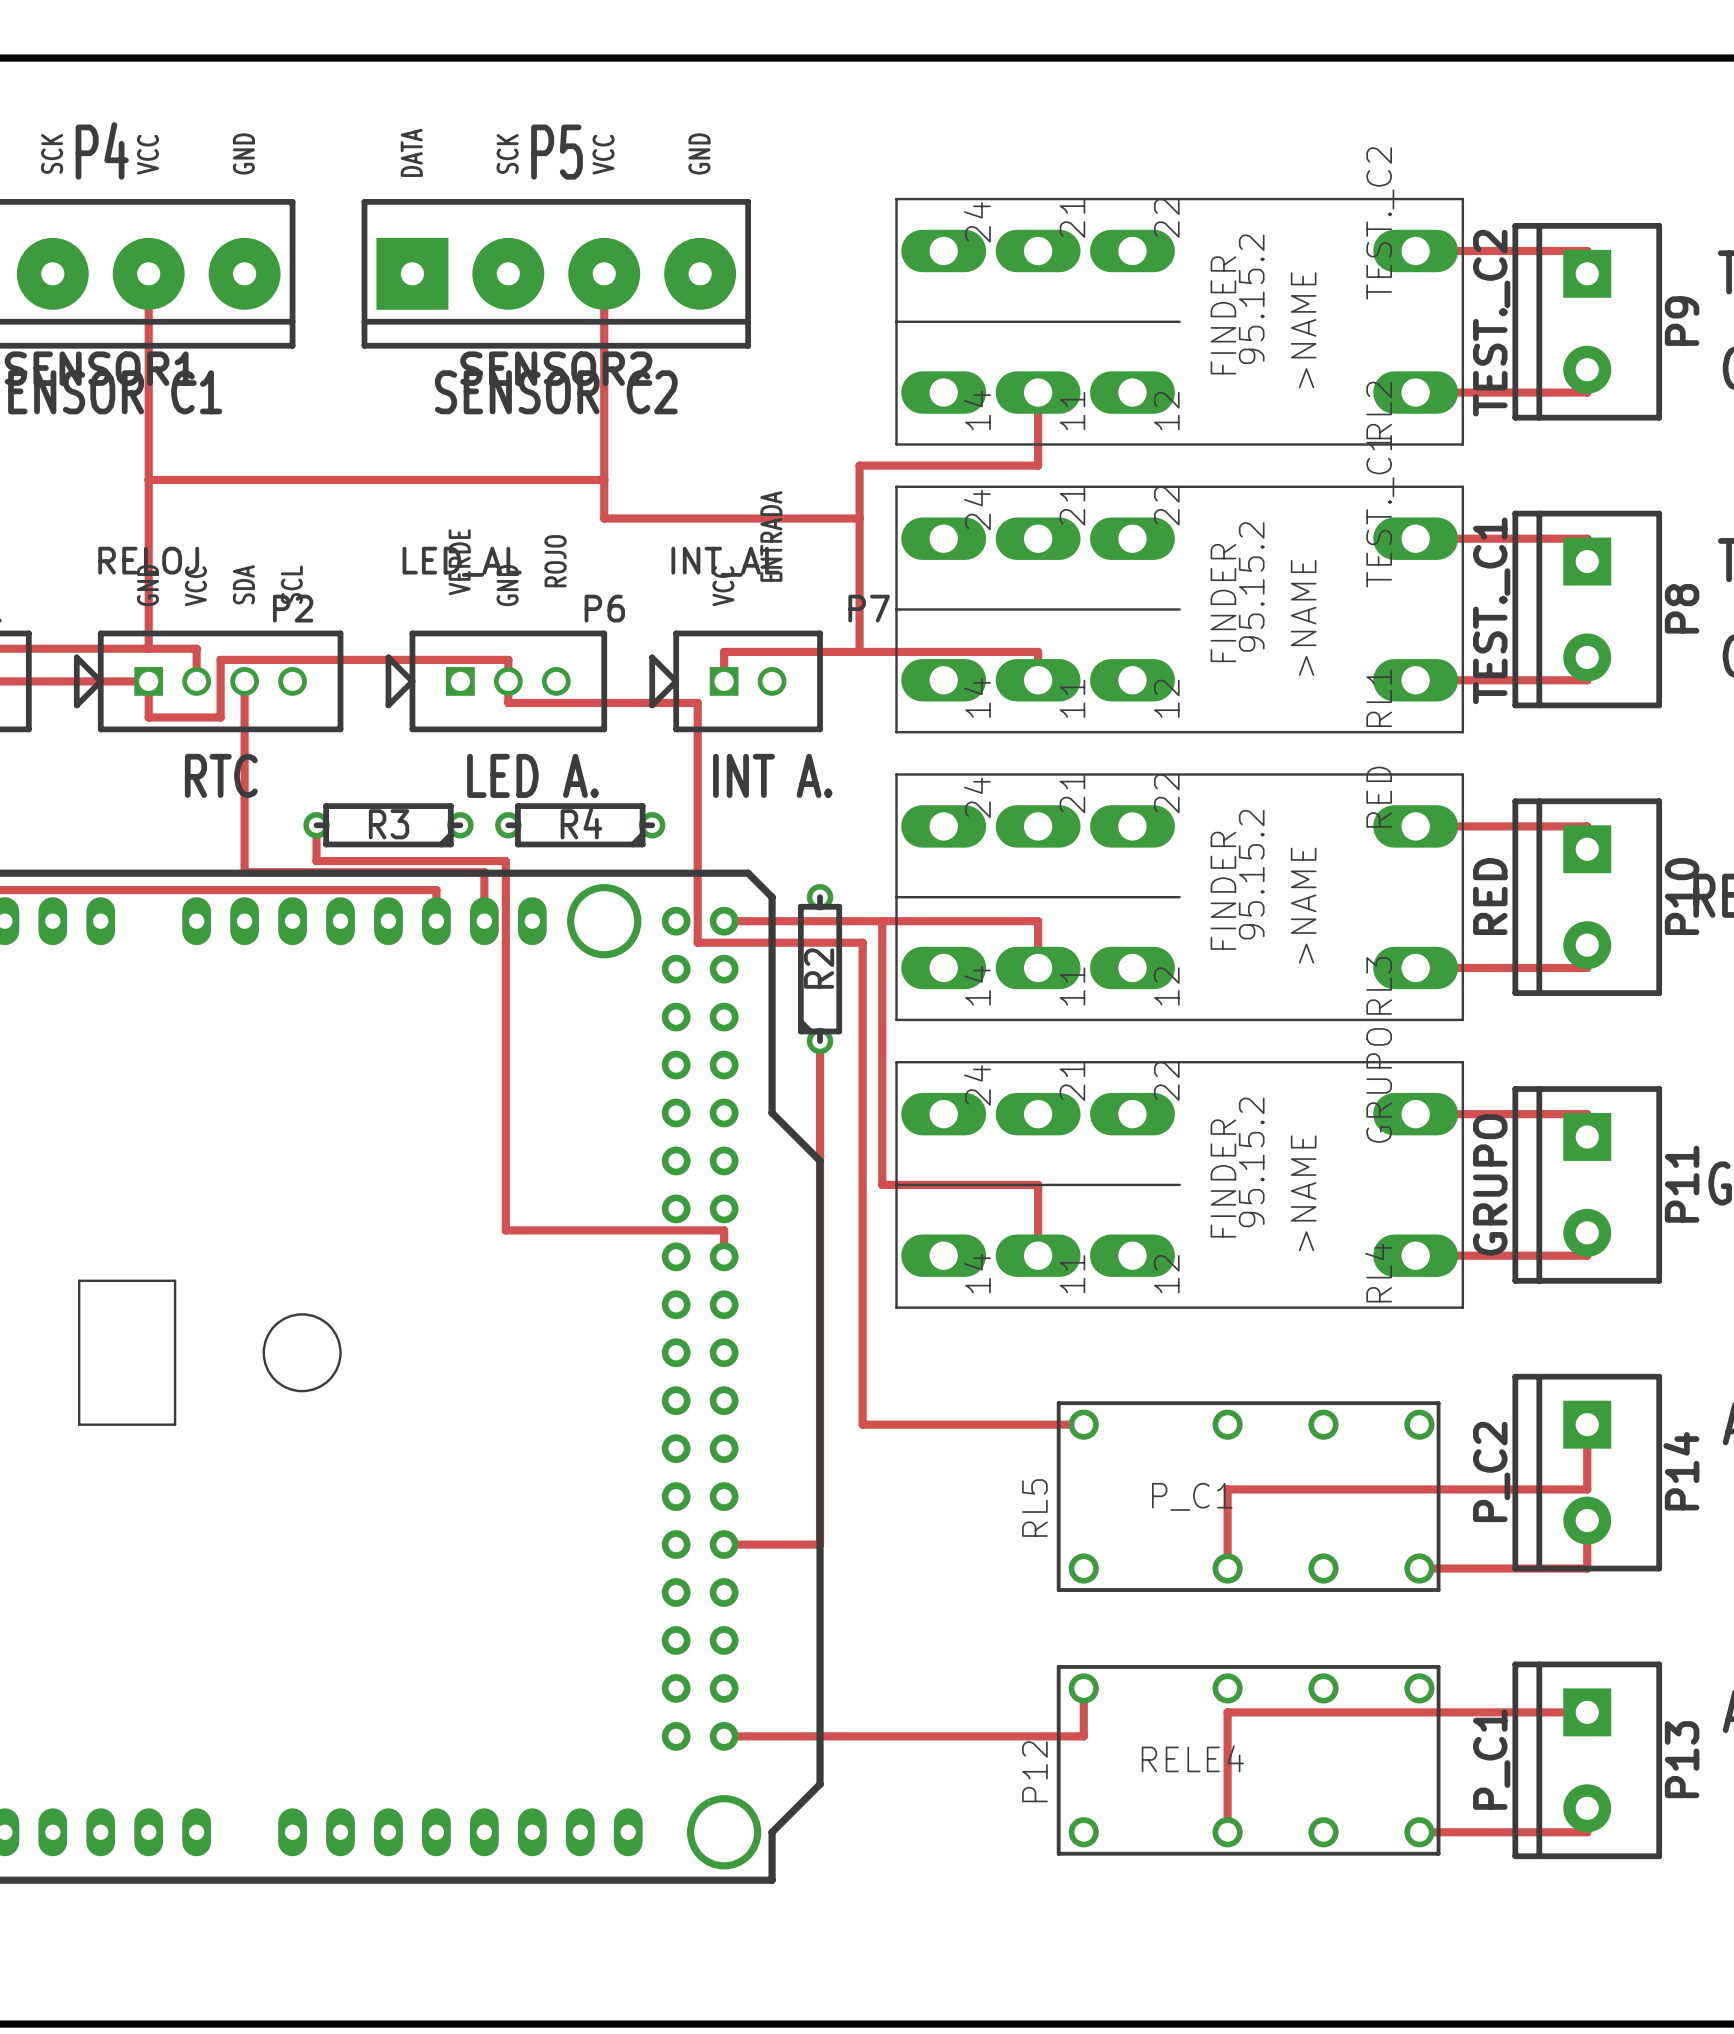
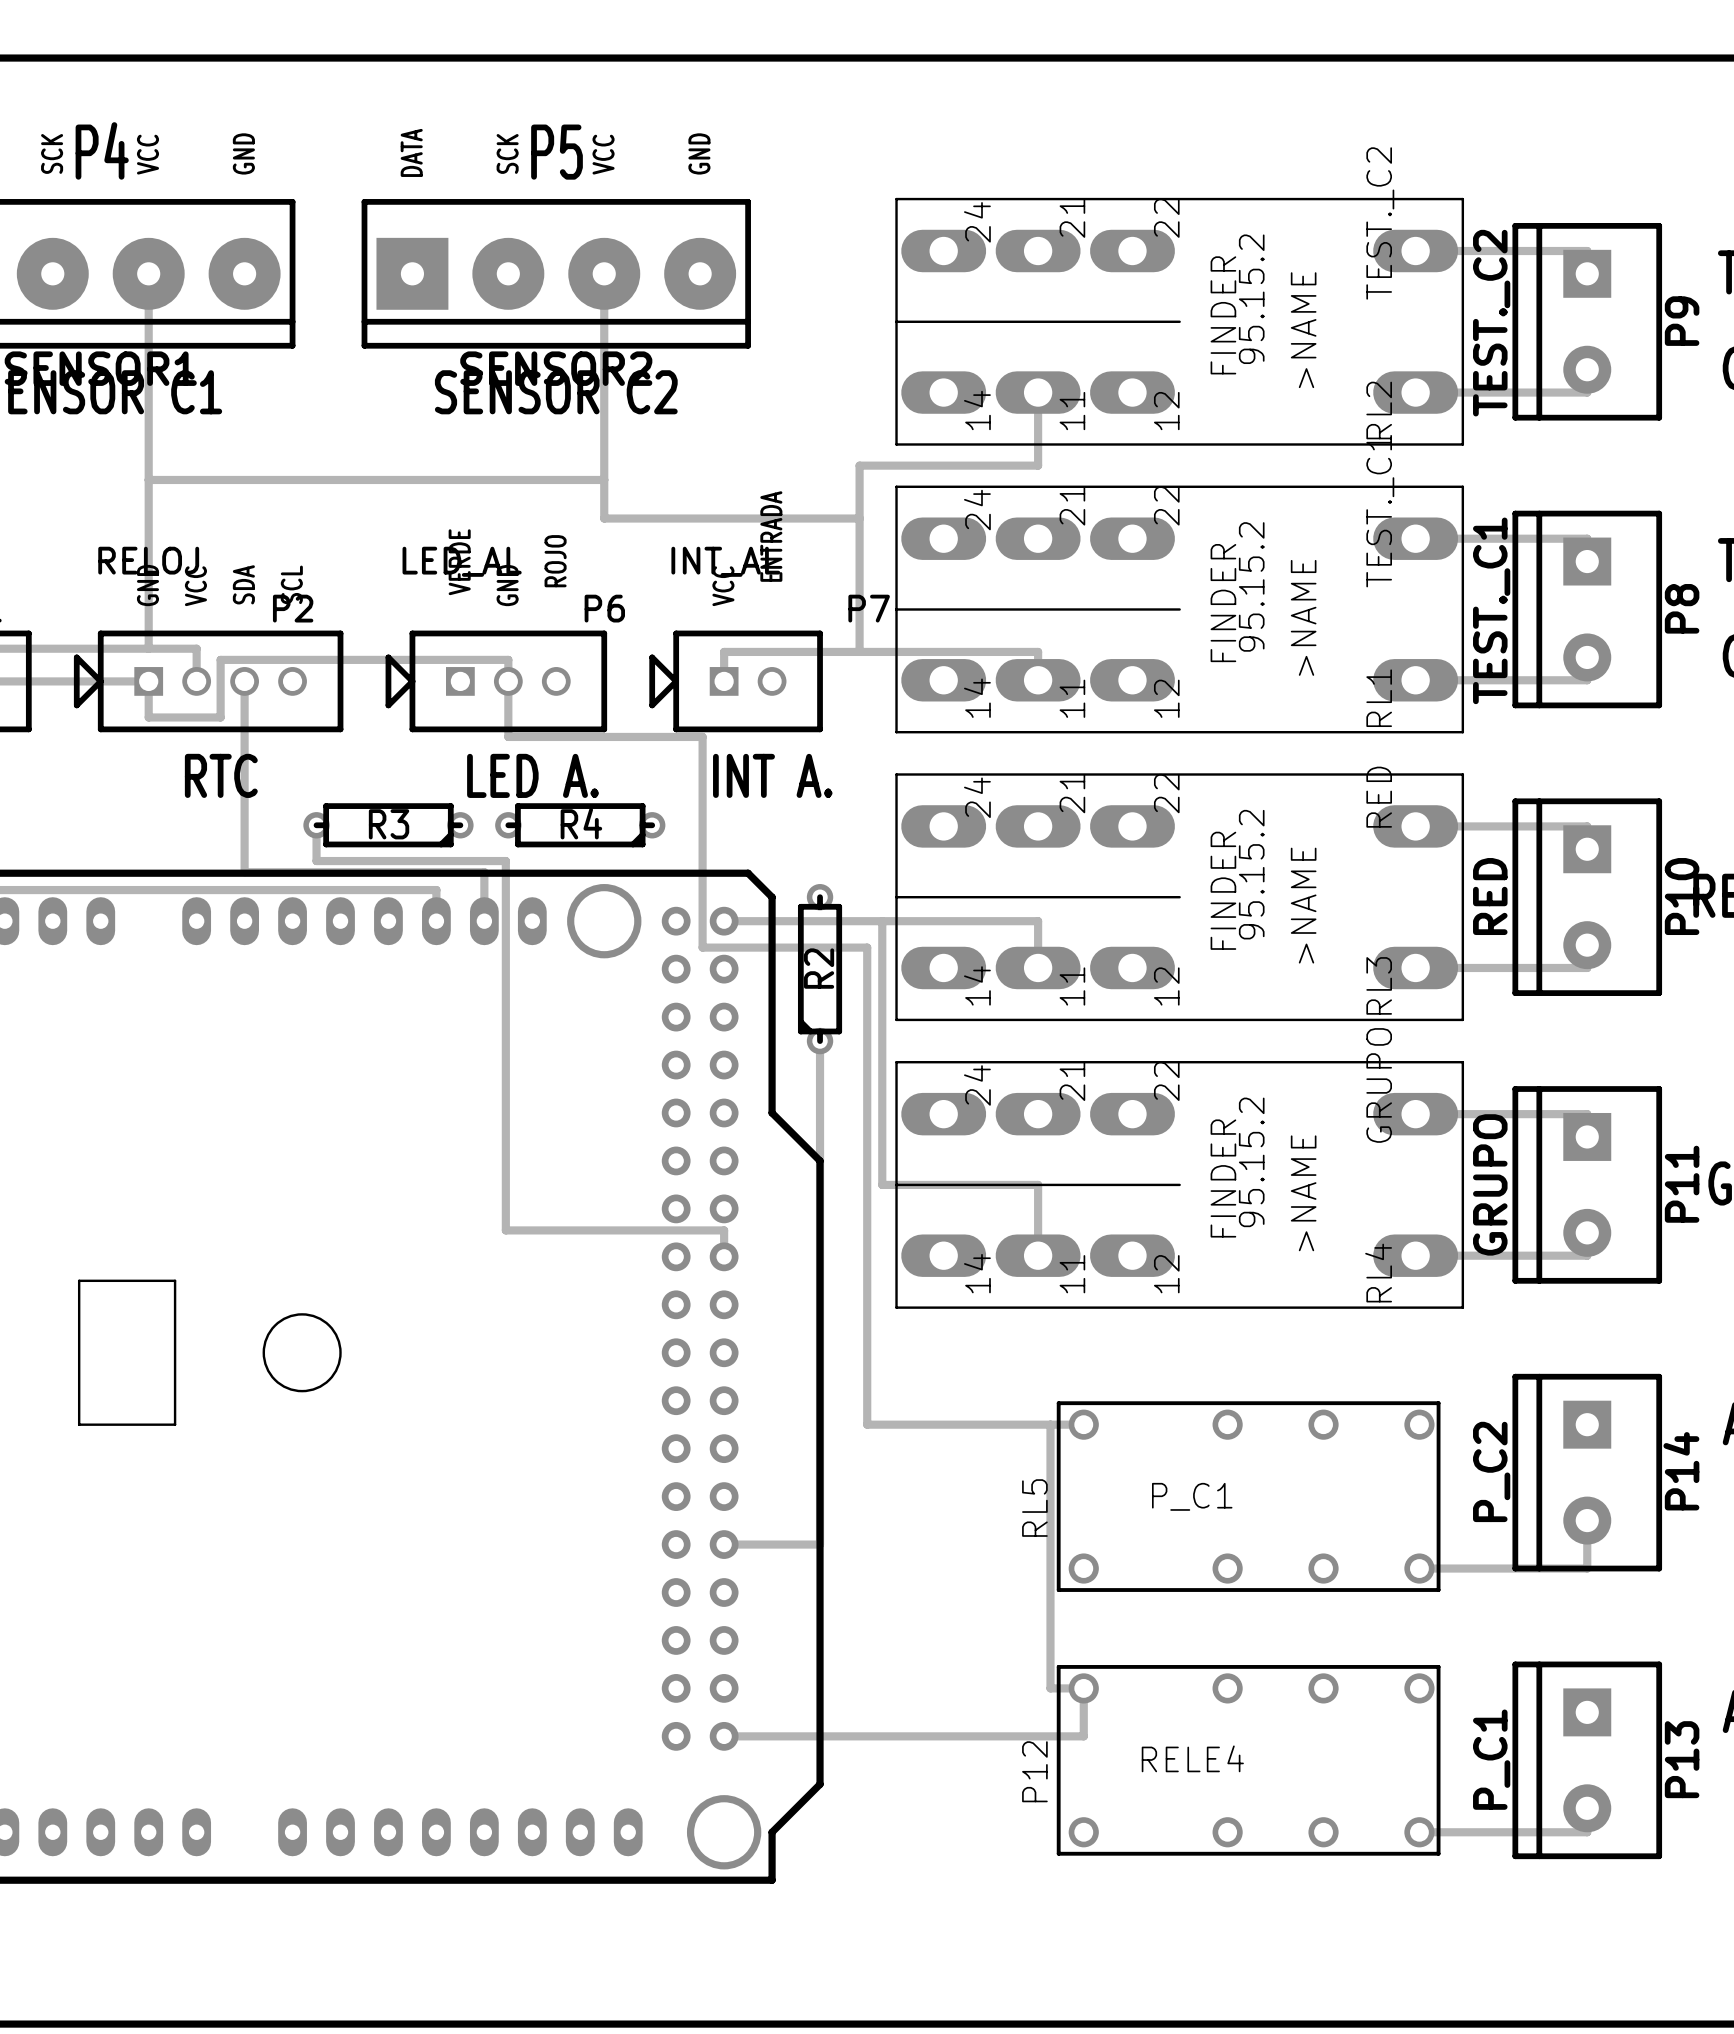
track: (508, 702) (697, 702) (697, 942) (862, 942) (862, 1424) (867, 1424) -> (508, 702) (508, 736) (702, 736) (702, 947) (867, 947) (867, 1424)
track: none -> (1050, 1424) (1050, 1688) (1083, 1688)
track: (1587, 1424) (1587, 1489) (1227, 1489) (1227, 1568) -> none
track: (1587, 1712) (1227, 1712) (1227, 1832) -> none

